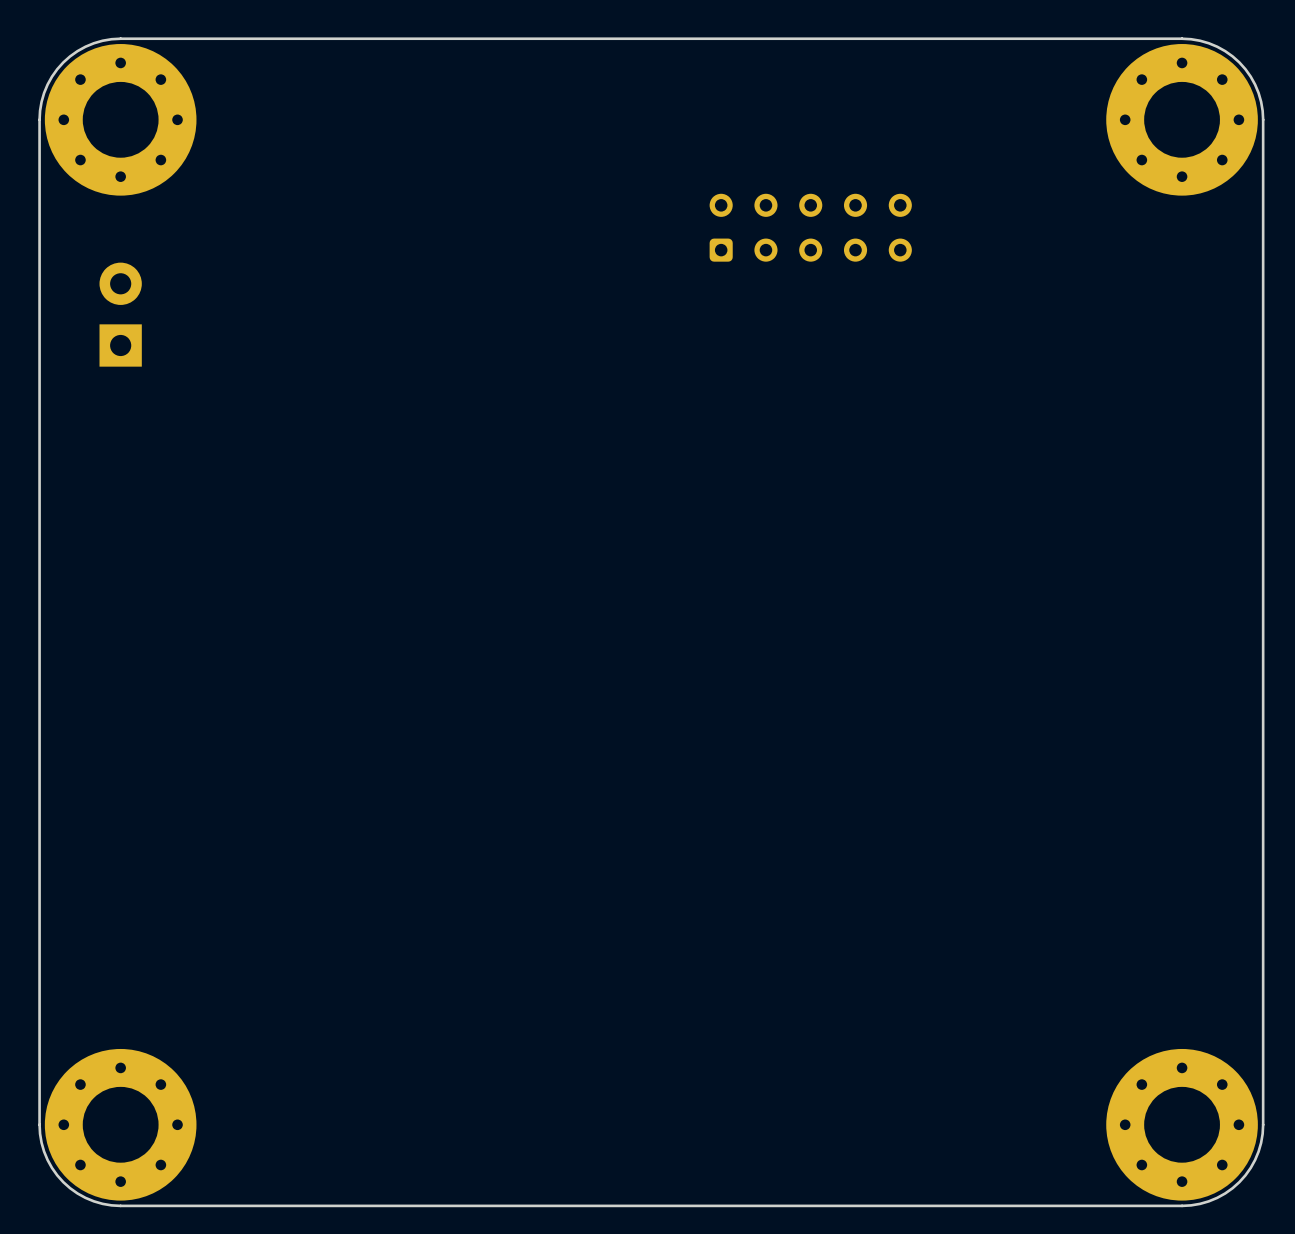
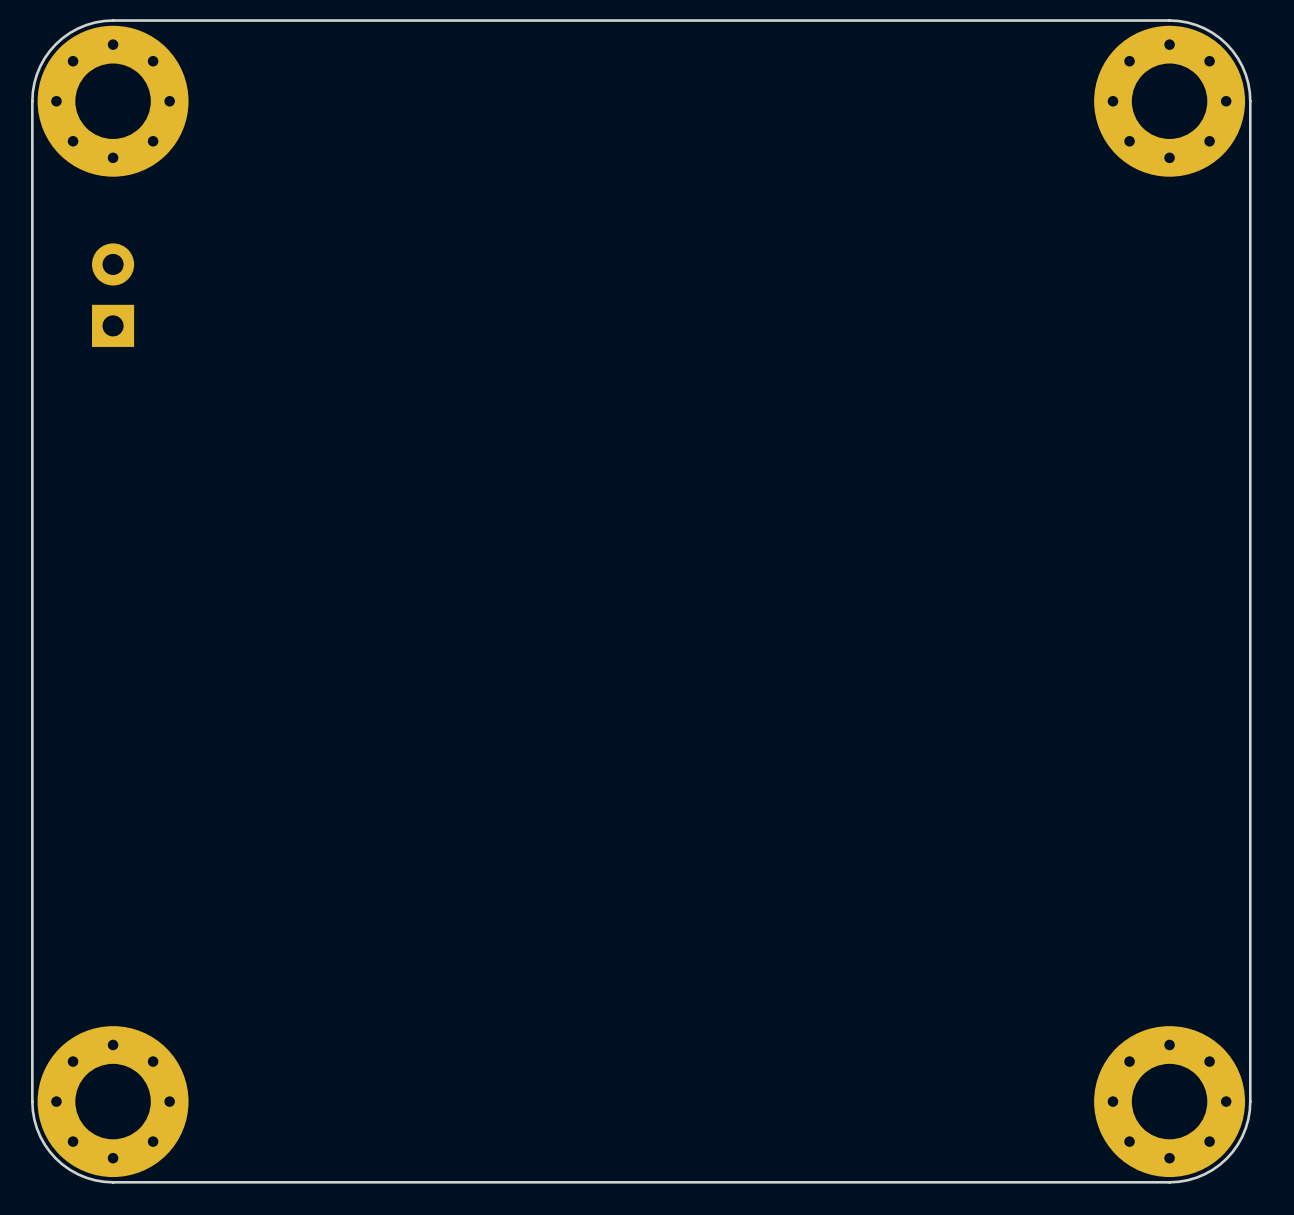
part: (810, 227) -> none

